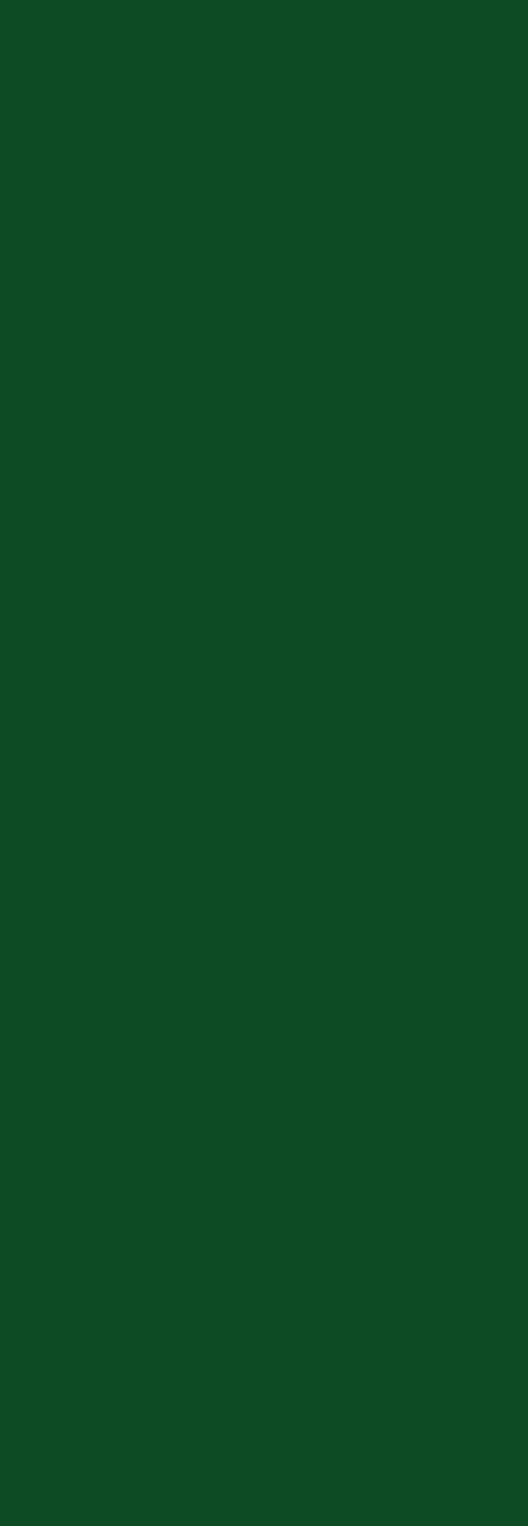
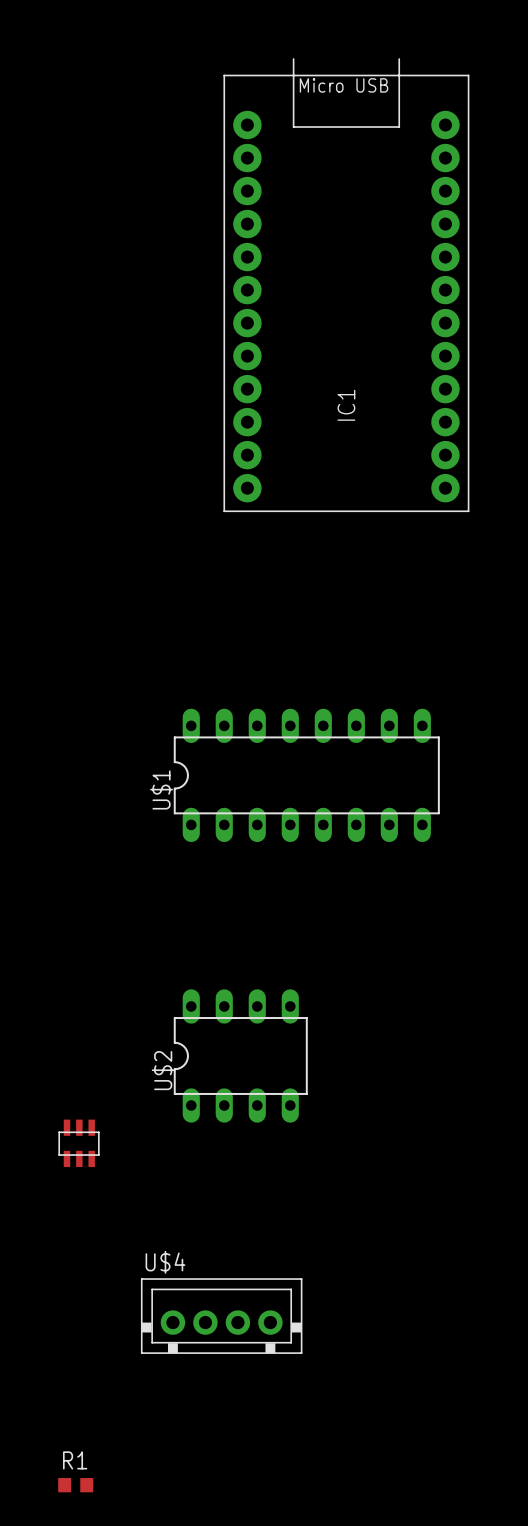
IC1: none -> (346, 285)
U$1: none -> (306, 775)
U$2: none -> (240, 1055)
part: none -> (79, 1143)
U$4: none -> (221, 1316)
R1: none -> (75, 1485)

